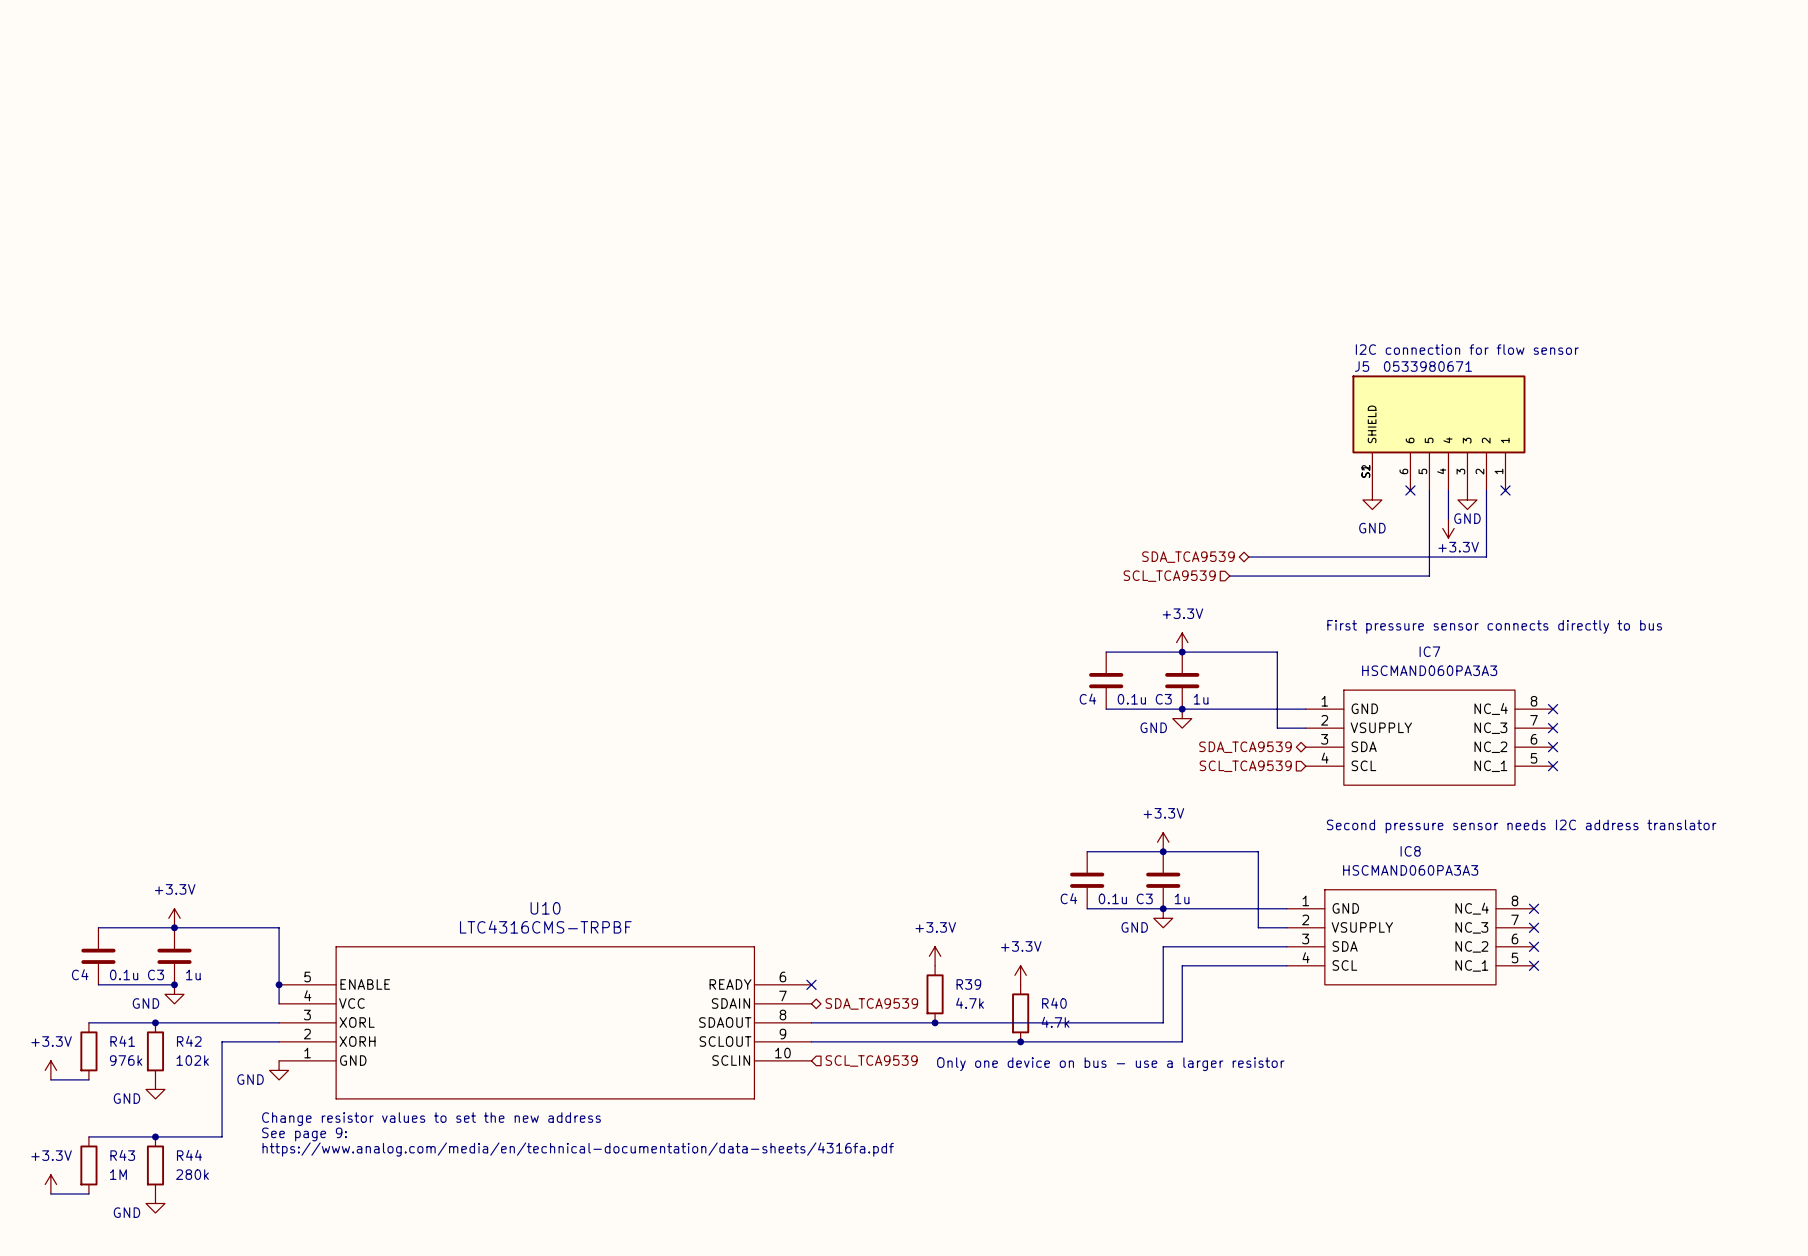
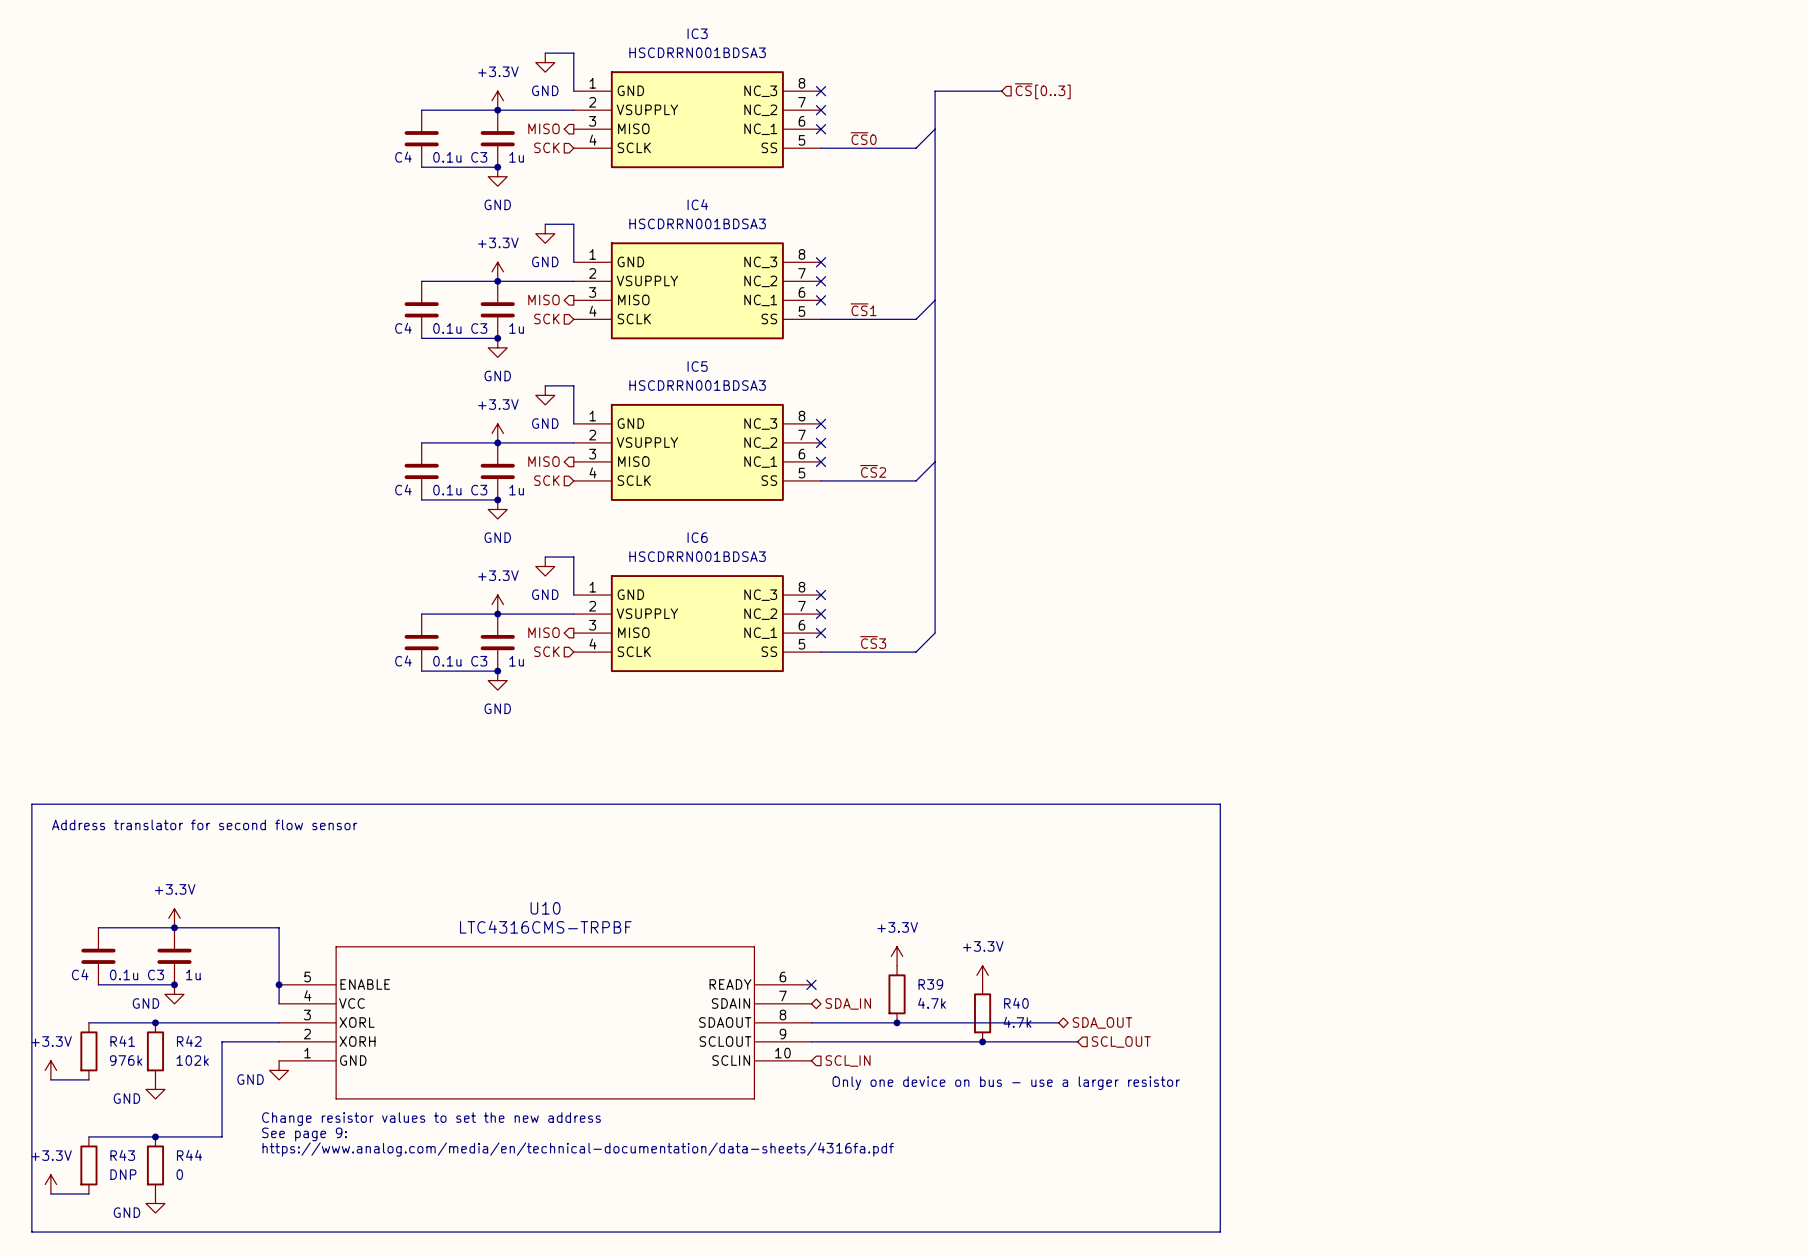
wire: none -> (545, 53) (573, 53) (573, 91)
power symbol: none -> GND (545, 62)
no-connect mark: none -> (820, 91)
bus: none -> (1001, 91) (935, 91) (935, 633)
hierarchical label: none -> ~{CS}[0..3] (1042, 91)
power symbol: none -> +3.3V (497, 100)
wire: none -> (421, 110) (573, 110)
junction: none -> (497, 110)
no-connect mark: none -> (820, 110)
IC3: none -> HSCDRRN001BDSA3 (697, 119)
hierarchical label: none -> MISO (543, 128)
no-connect mark: none -> (820, 129)
wire: none -> (935, 129) (916, 148) (820, 148)
C4: none -> 0.1u (421, 138)
C3: none -> 1u (497, 138)
label: none -> ~{CS}0 (863, 138)
hierarchical label: none -> SCK (546, 147)
wire: none -> (421, 167) (497, 167)
junction: none -> (497, 167)
power symbol: none -> GND (497, 176)
wire: none -> (545, 224) (573, 224) (573, 262)
power symbol: none -> GND (545, 233)
no-connect mark: none -> (820, 262)
power symbol: none -> +3.3V (497, 271)
wire: none -> (421, 281) (573, 281)
junction: none -> (497, 281)
no-connect mark: none -> (820, 281)
IC4: none -> HSCDRRN001BDSA3 (697, 290)
hierarchical label: none -> MISO (543, 299)
no-connect mark: none -> (820, 300)
wire: none -> (935, 300) (916, 319) (820, 319)
C4: none -> 0.1u (421, 309)
C3: none -> 1u (497, 309)
label: none -> ~{CS}1 (863, 309)
hierarchical label: none -> SCK (546, 318)
wire: none -> (421, 338) (497, 338)
junction: none -> (497, 338)
power symbol: none -> GND (497, 347)
text: I2C connection for flow sensor (1467, 349) -> none
wire: none -> (545, 385) (573, 385) (573, 423)
power symbol: none -> GND (545, 395)
no-connect mark: none -> (820, 423)
J5: 0533980671 (1438, 432) -> none
power symbol: none -> +3.3V (497, 433)
wire: none -> (421, 442) (573, 442)
junction: none -> (497, 442)
no-connect mark: none -> (820, 442)
IC5: none -> HSCDRRN001BDSA3 (697, 452)
hierarchical label: none -> MISO (543, 461)
no-connect mark: none -> (820, 461)
wire: none -> (935, 461) (916, 480) (820, 480)
C4: none -> 0.1u (421, 471)
C3: none -> 1u (497, 471)
label: none -> ~{CS}2 (873, 471)
hierarchical label: none -> SCK (546, 480)
no-connect mark: (1410, 490) -> none
wire: (1429, 490) (1429, 576) (1229, 576) -> none
wire: (1448, 490) (1448, 518) -> none
wire: (1486, 490) (1486, 557) (1248, 557) -> none
no-connect mark: (1505, 490) -> none
wire: none -> (421, 499) (497, 499)
junction: none -> (497, 499)
power symbol: GND (1372, 499) -> none
power symbol: GND (1467, 499) -> none
power symbol: none -> GND (497, 509)
power symbol: +3.3V (1448, 528) -> none
wire: none -> (545, 557) (573, 557) (573, 595)
hierarchical label: SDA_TCA9539 (1188, 557) -> none
power symbol: none -> GND (545, 566)
hierarchical label: SCL_TCA9539 (1169, 576) -> none
no-connect mark: none -> (820, 595)
power symbol: none -> +3.3V (497, 604)
wire: none -> (421, 614) (573, 614)
junction: none -> (497, 614)
no-connect mark: none -> (820, 614)
IC6: none -> HSCDRRN001BDSA3 (697, 623)
text: First pressure sensor connects directly to bus (1494, 626) -> none
hierarchical label: none -> MISO (543, 632)
no-connect mark: none -> (820, 633)
wire: none -> (935, 633) (916, 652) (820, 652)
C4: none -> 0.1u (421, 642)
C3: none -> 1u (497, 642)
label: none -> ~{CS}3 (873, 642)
power symbol: +3.3V (1182, 642) -> none
hierarchical label: none -> SCK (546, 651)
wire: (1106, 652) (1277, 652) (1277, 728) (1305, 728) -> none
junction: (1182, 652) -> none
wire: none -> (421, 671) (497, 671)
junction: none -> (497, 671)
power symbol: none -> GND (497, 680)
C4: 0.1u (1106, 680) -> none
C3: 1u (1182, 680) -> none
wire: (1106, 709) (1305, 709) -> none
junction: (1182, 709) -> none
no-connect mark: (1553, 709) -> none
power symbol: GND (1182, 718) -> none
no-connect mark: (1553, 728) -> none
IC7: HSCMAND060PA3A3 (1429, 737) -> none
hierarchical label: SDA_TCA9539 (1245, 747) -> none
no-connect mark: (1553, 747) -> none
hierarchical label: SCL_TCA9539 (1245, 766) -> none
no-connect mark: (1553, 766) -> none
line: none -> (31, 804) (1220, 804) (1220, 1232) (31, 1232) (31, 804)
text: none -> Address translator for second flow sensor (204, 824)
text: Second pressure sensor needs I2C address translator (1521, 826) -> none
power symbol: +3.3V (1163, 842) -> none
wire: (1087, 851) (1258, 851) (1258, 927) (1286, 927) -> none
junction: (1163, 851) -> none
C4: 0.1u (1087, 880) -> none
C3: 1u (1163, 880) -> none
wire: (1087, 908) (1286, 908) -> none
junction: (1163, 908) -> none
no-connect mark: (1534, 908) -> none
power symbol: GND (1163, 918) -> none
no-connect mark: (1534, 927) -> none
IC8: HSCMAND060PA3A3 (1410, 937) -> none
wire: (1286, 946) (1163, 946) (1163, 1022) (1058, 1022) -> none
no-connect mark: (1534, 946) -> none
power symbol: none -> +3.3V (897, 956)
power symbol: +3.3V (935, 956) -> none
wire: (1286, 965) (1182, 965) (1182, 1041) (1077, 1041) -> none
no-connect mark: (1534, 965) -> none
power symbol: none -> +3.3V (982, 975)
power symbol: +3.3V (1020, 975) -> none
R39 position: (935, 994) -> (897, 994)
hierarchical label: SDA_TCA9539 (871, 1003) -> SDA_IN (848, 1003)
R40 position: (1020, 1013) -> (982, 1013)
junction: none -> (897, 1022)
junction: (935, 1022) -> none
hierarchical label: none -> SDA_OUT (1102, 1022)
junction: none -> (982, 1041)
junction: (1020, 1041) -> none
hierarchical label: none -> SCL_OUT (1121, 1041)
hierarchical label: SCL_TCA9539 (871, 1060) -> SCL_IN (848, 1060)
text position: Only one device on bus - use a larger resistor (1110, 1064) -> Only one device on bus - use a larger resistor (1006, 1083)
R43 value: 1M (118, 1174) -> DNP (123, 1174)
R44 value: 280k (192, 1174) -> 0 (179, 1174)

